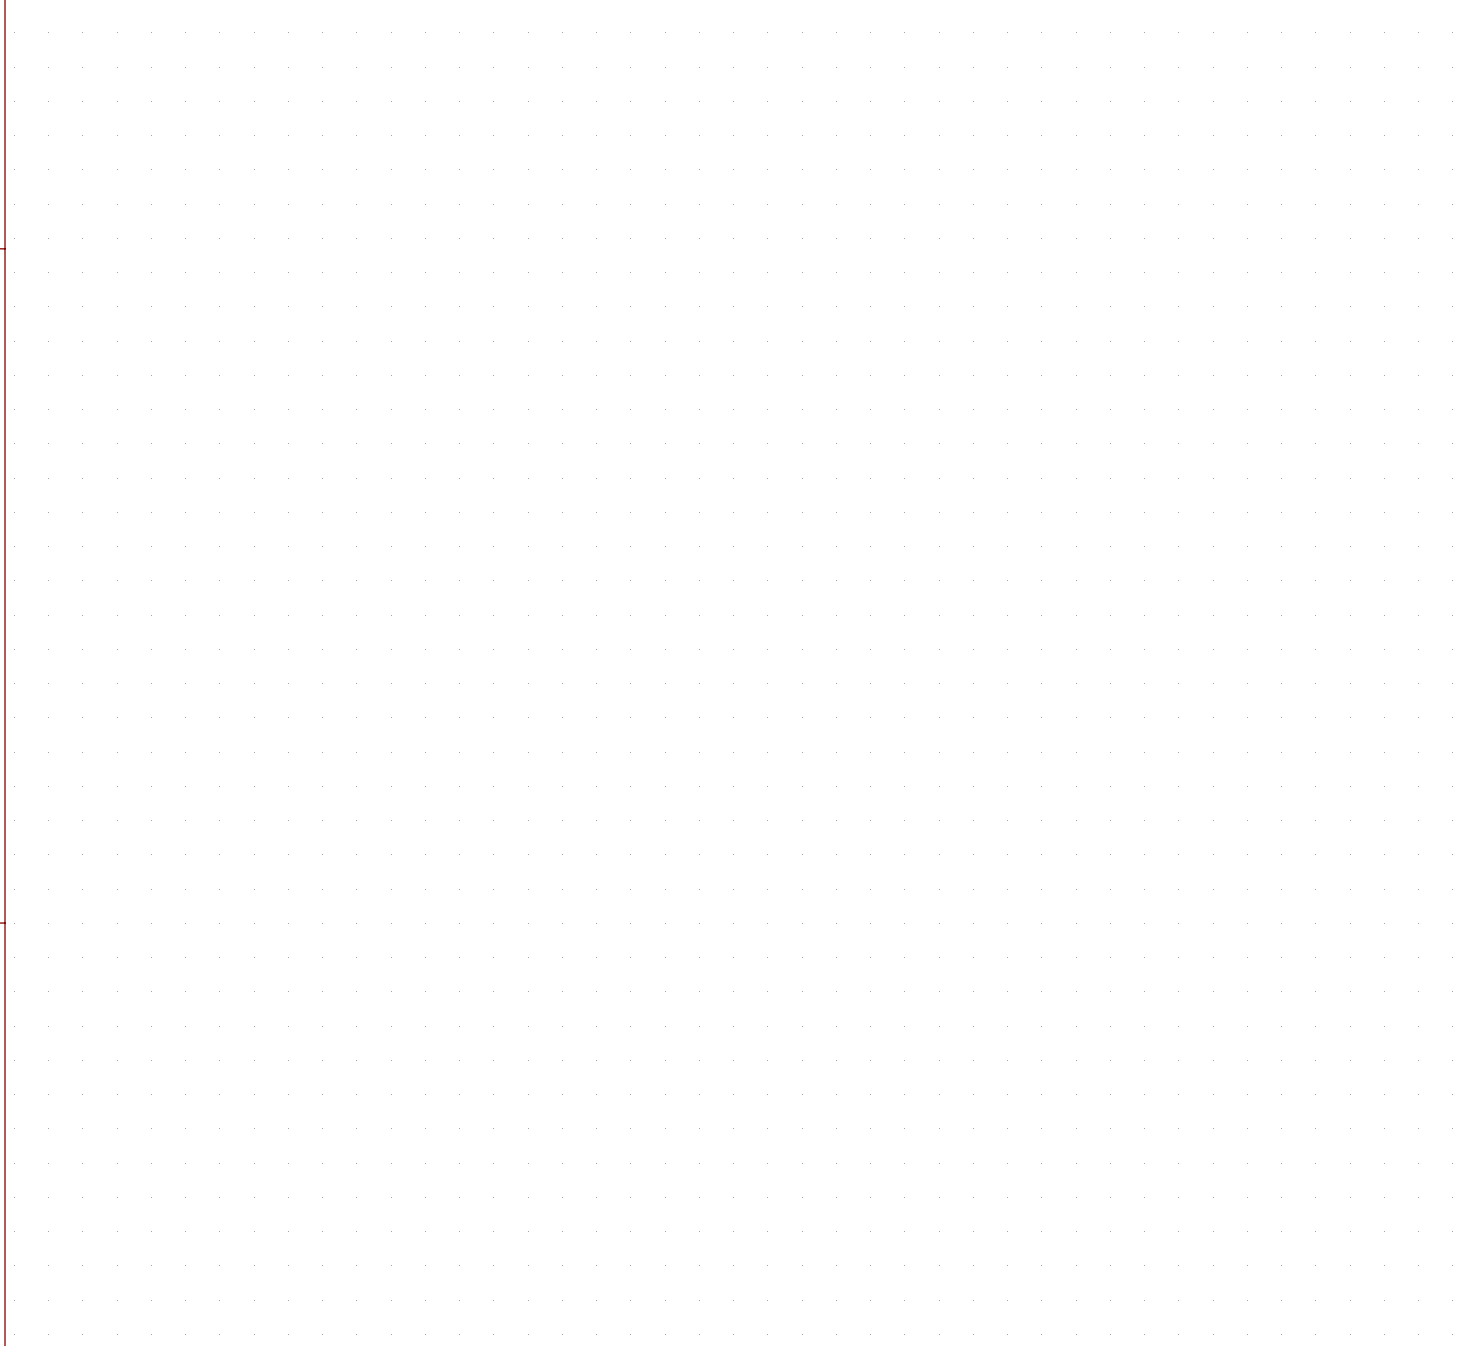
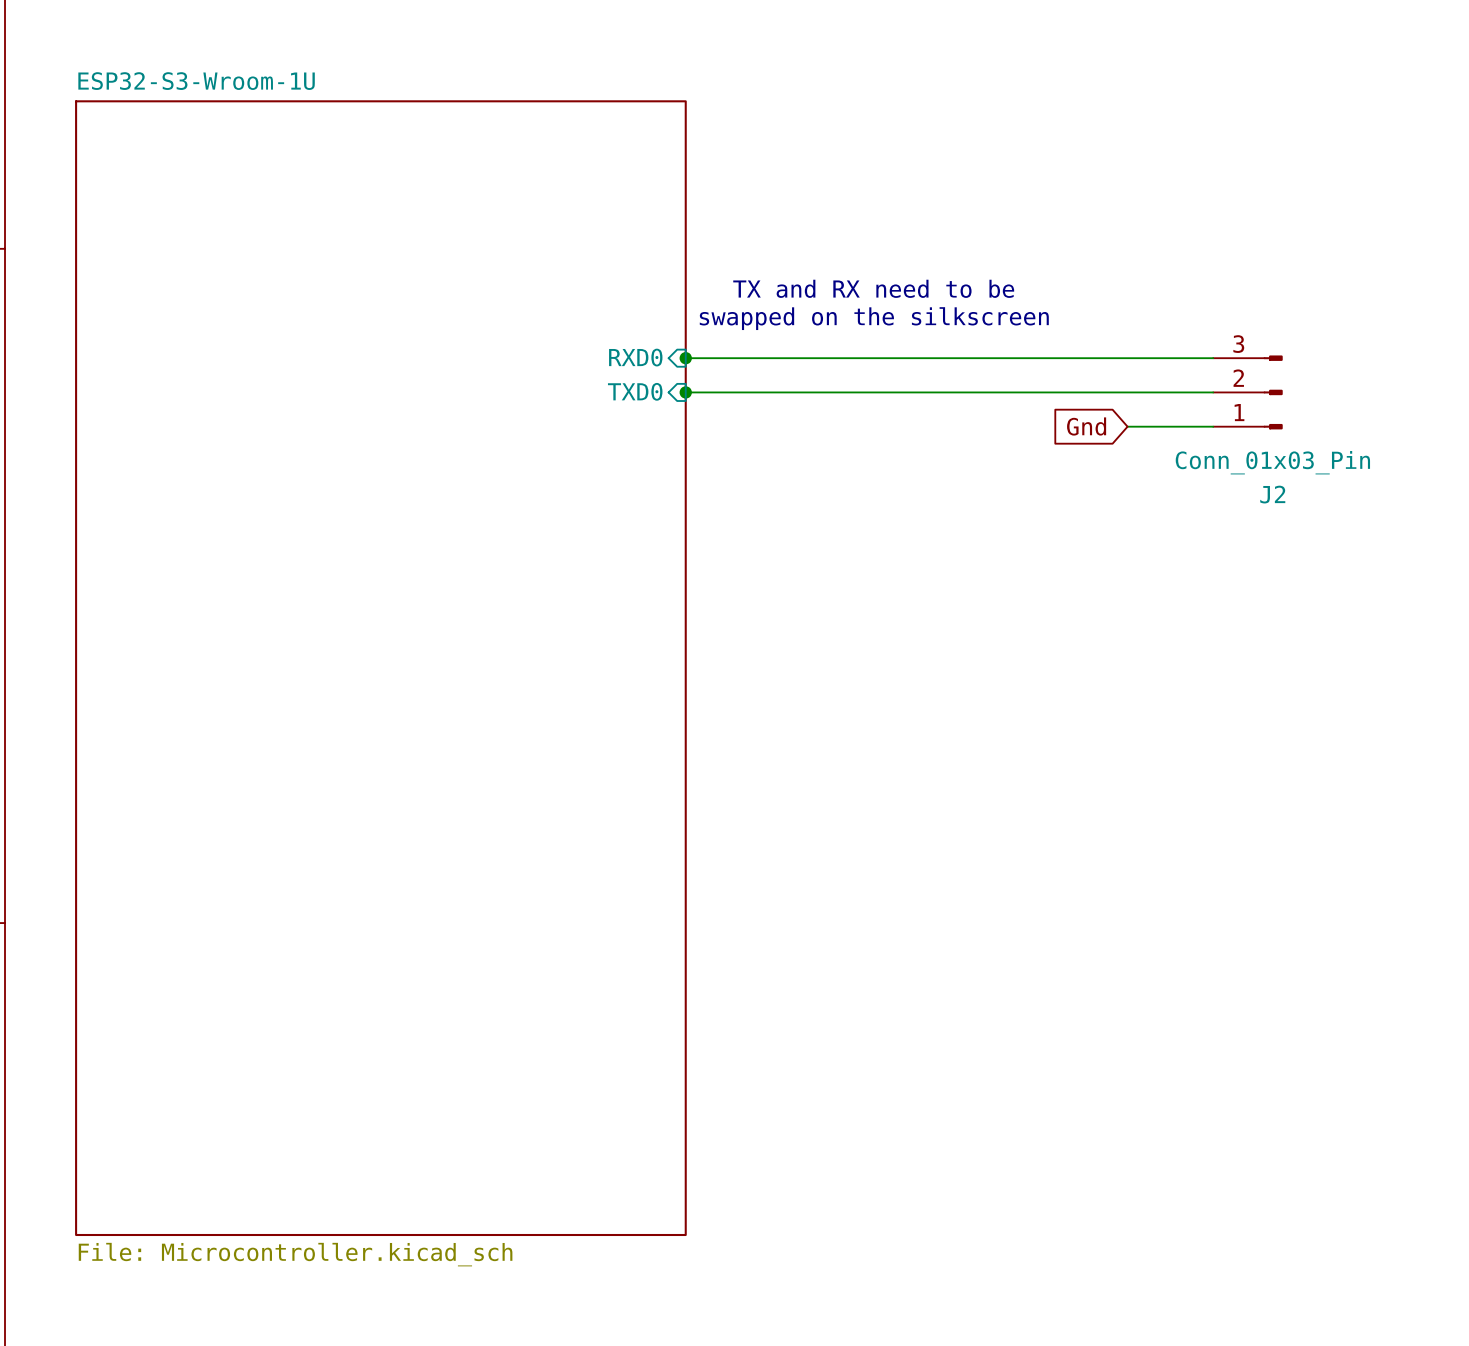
text: none -> TX and RX need to be (873, 288)
text: none -> swapped on the silkscreen (874, 318)
sheet pin: none -> RXD0 (635, 357)
wire: none -> (682, 358) (1213, 358)
junction: none -> (685, 358)
sheet pin: none -> TXD0 (635, 391)
wire: none -> (682, 392) (1213, 392)
junction: none -> (685, 392)
J2: none -> Conn_01x03_Pin (1247, 392)
global label: none -> Gnd (1086, 426)
wire: none -> (1127, 426) (1213, 426)
sheet ESP32-S3-Wroom-1U: none -> File: Microcontroller.kicad_sch (380, 668)

